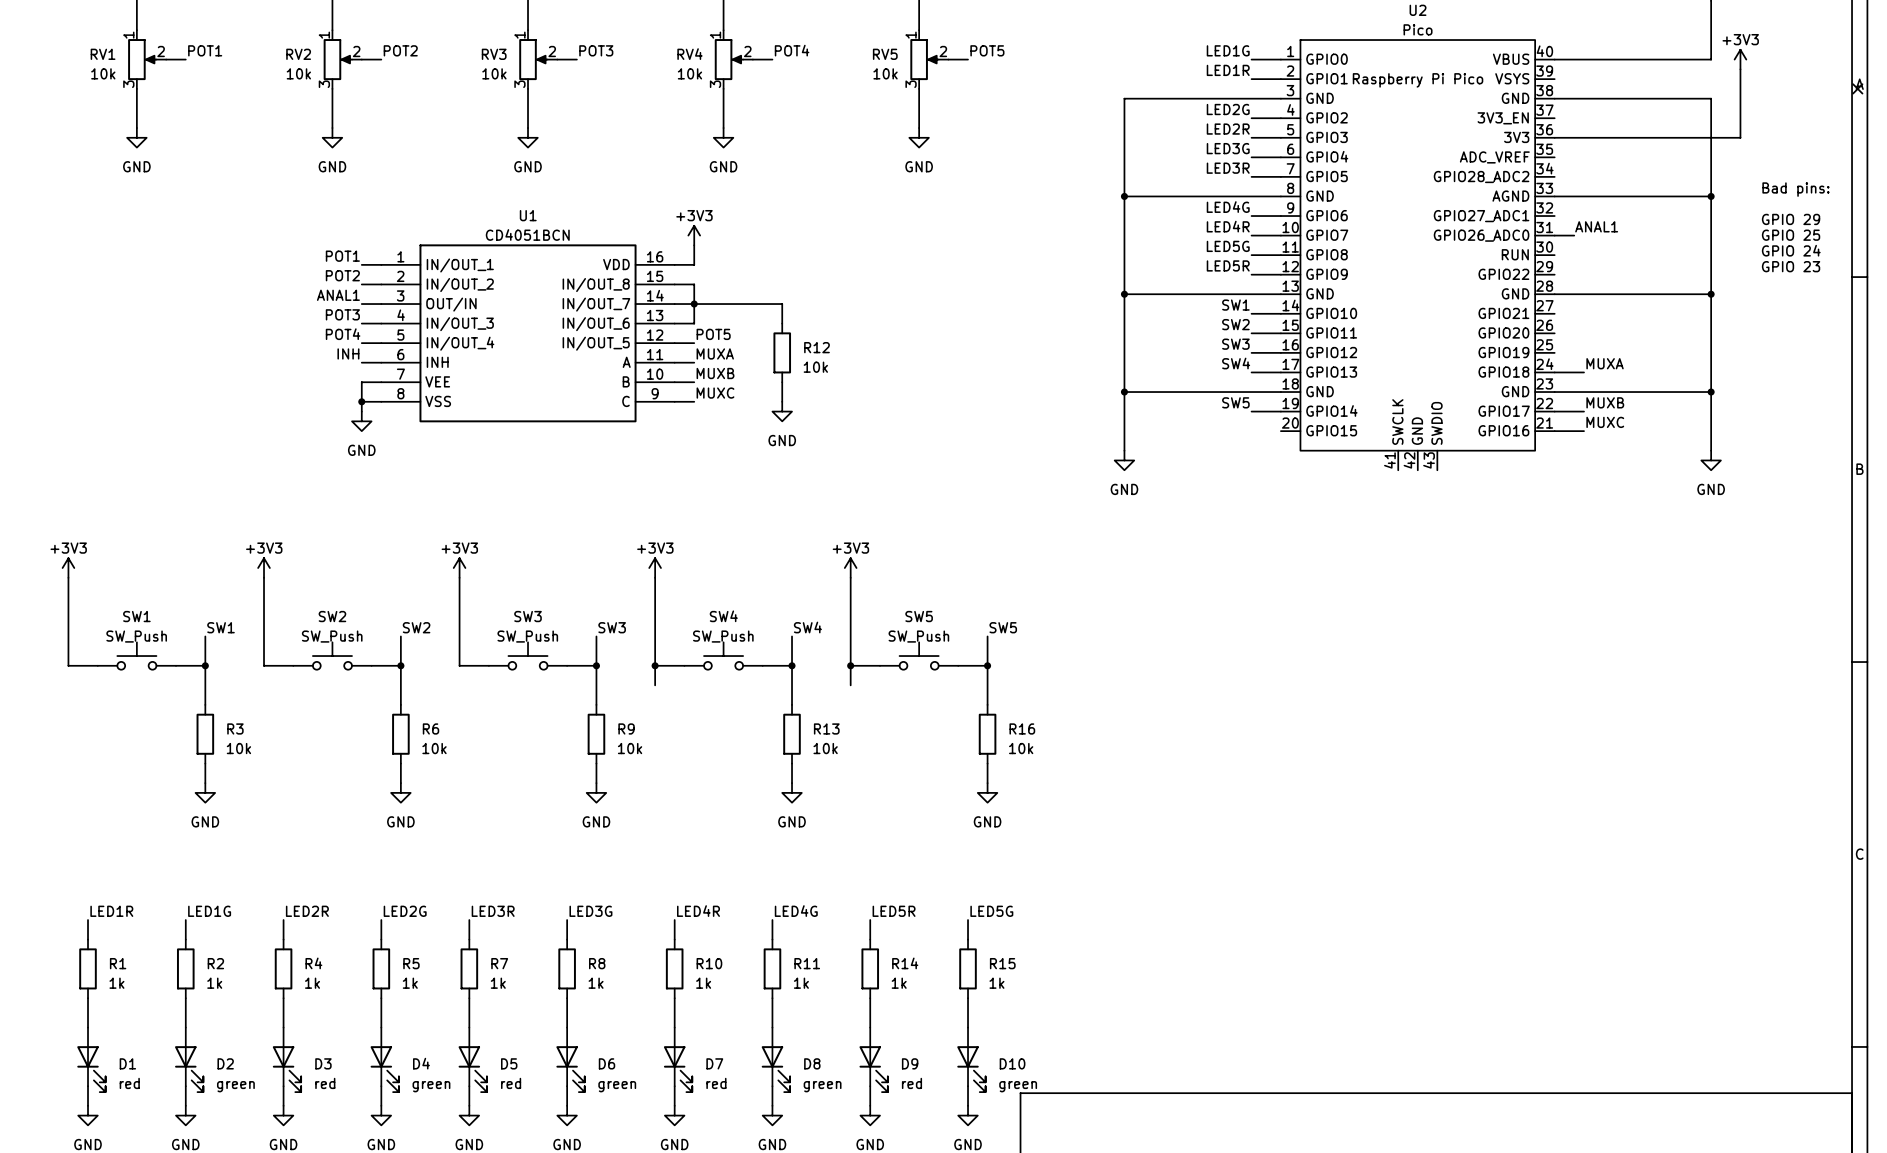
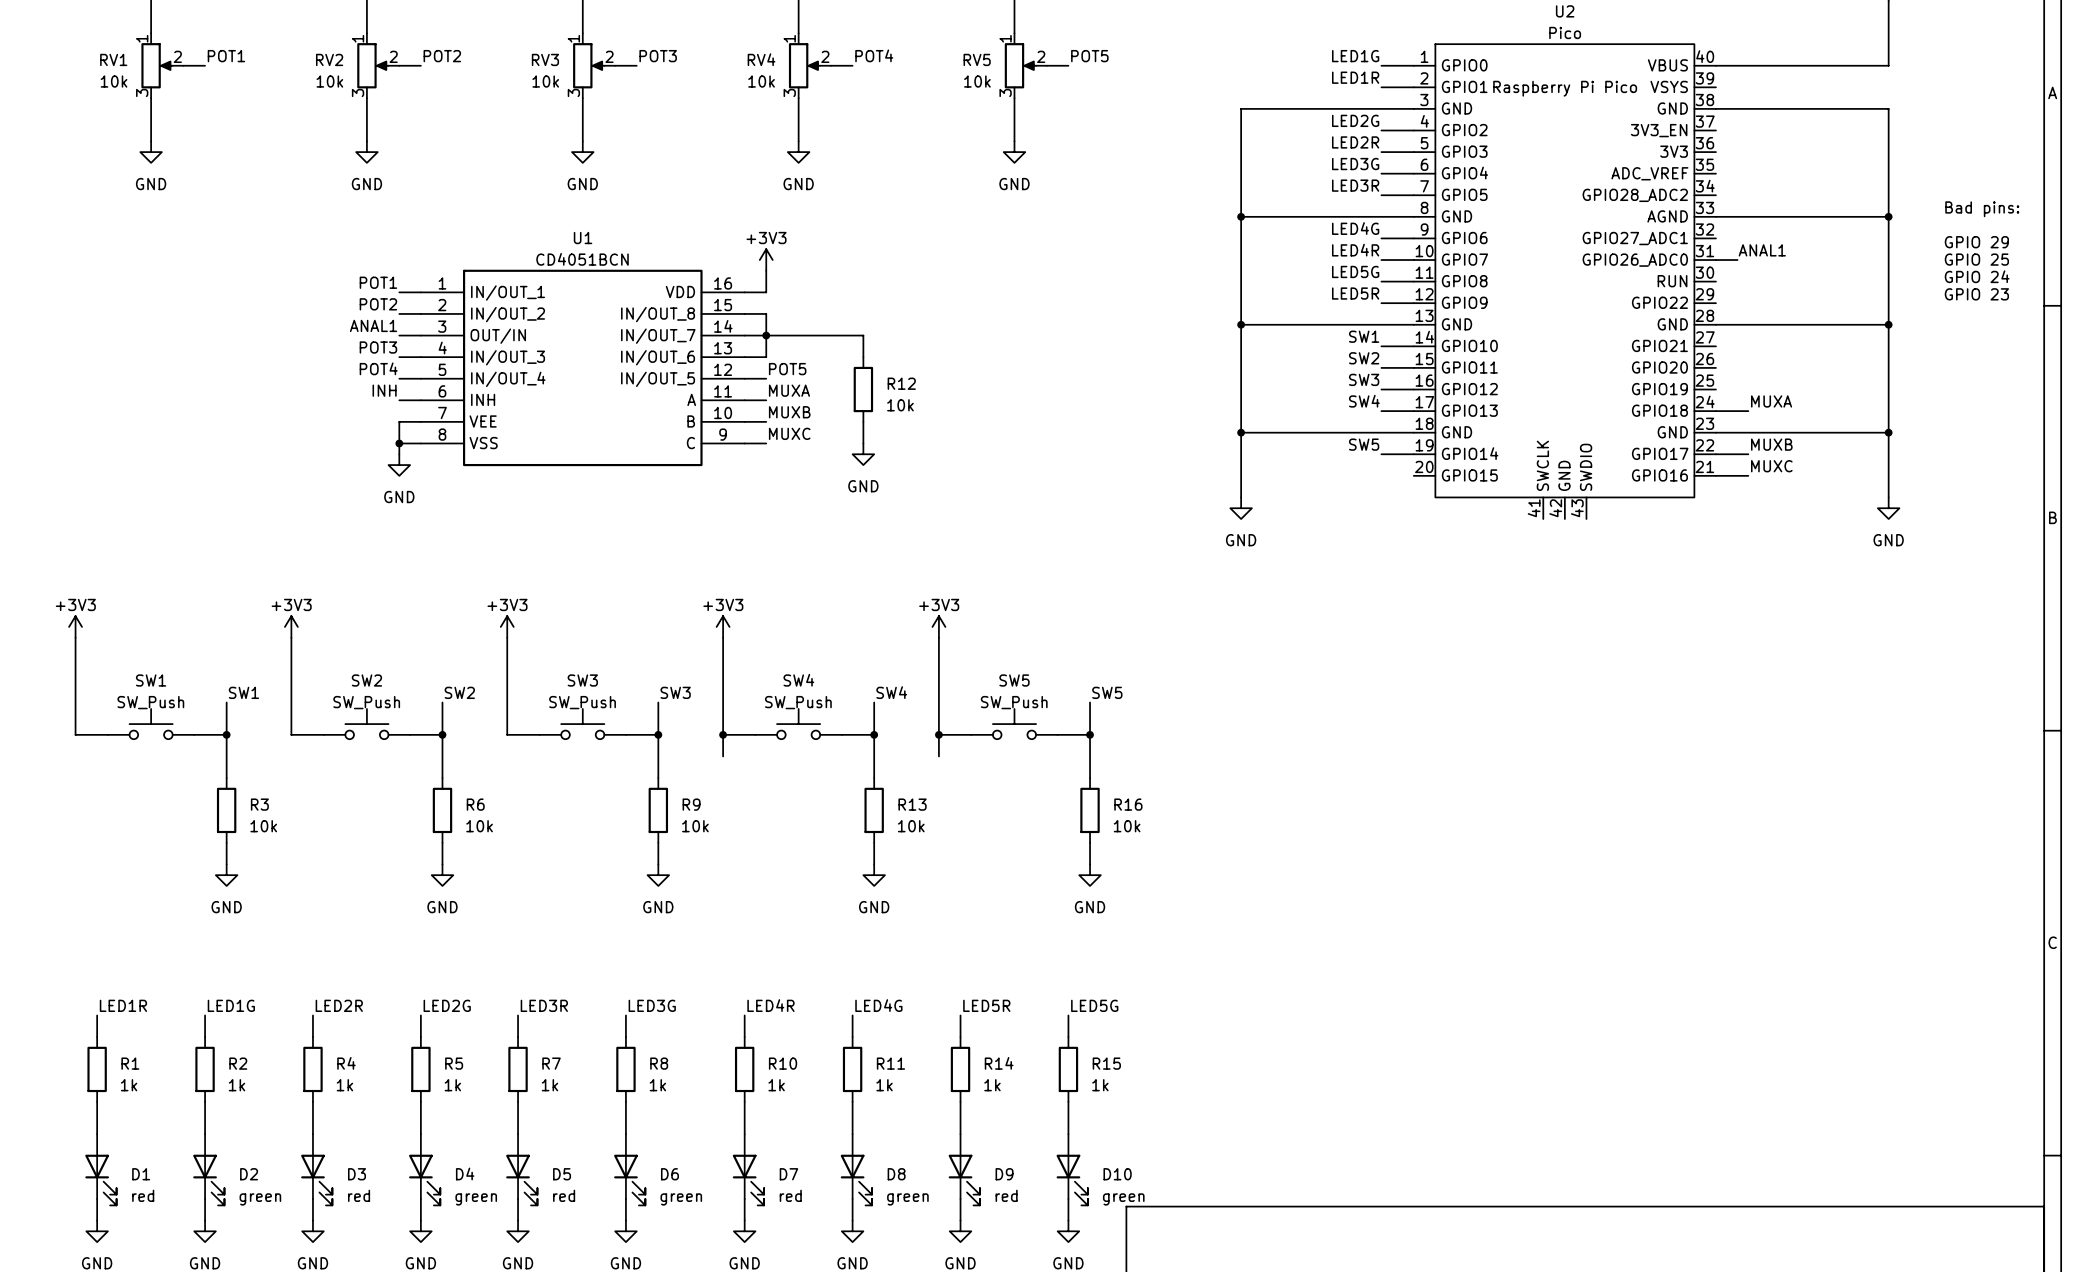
power symbol: +3V3 (1740, 59) -> none
wire: (1740, 69) (1740, 137) (1554, 137) -> none
no-connect mark: (1857, 88) -> none

